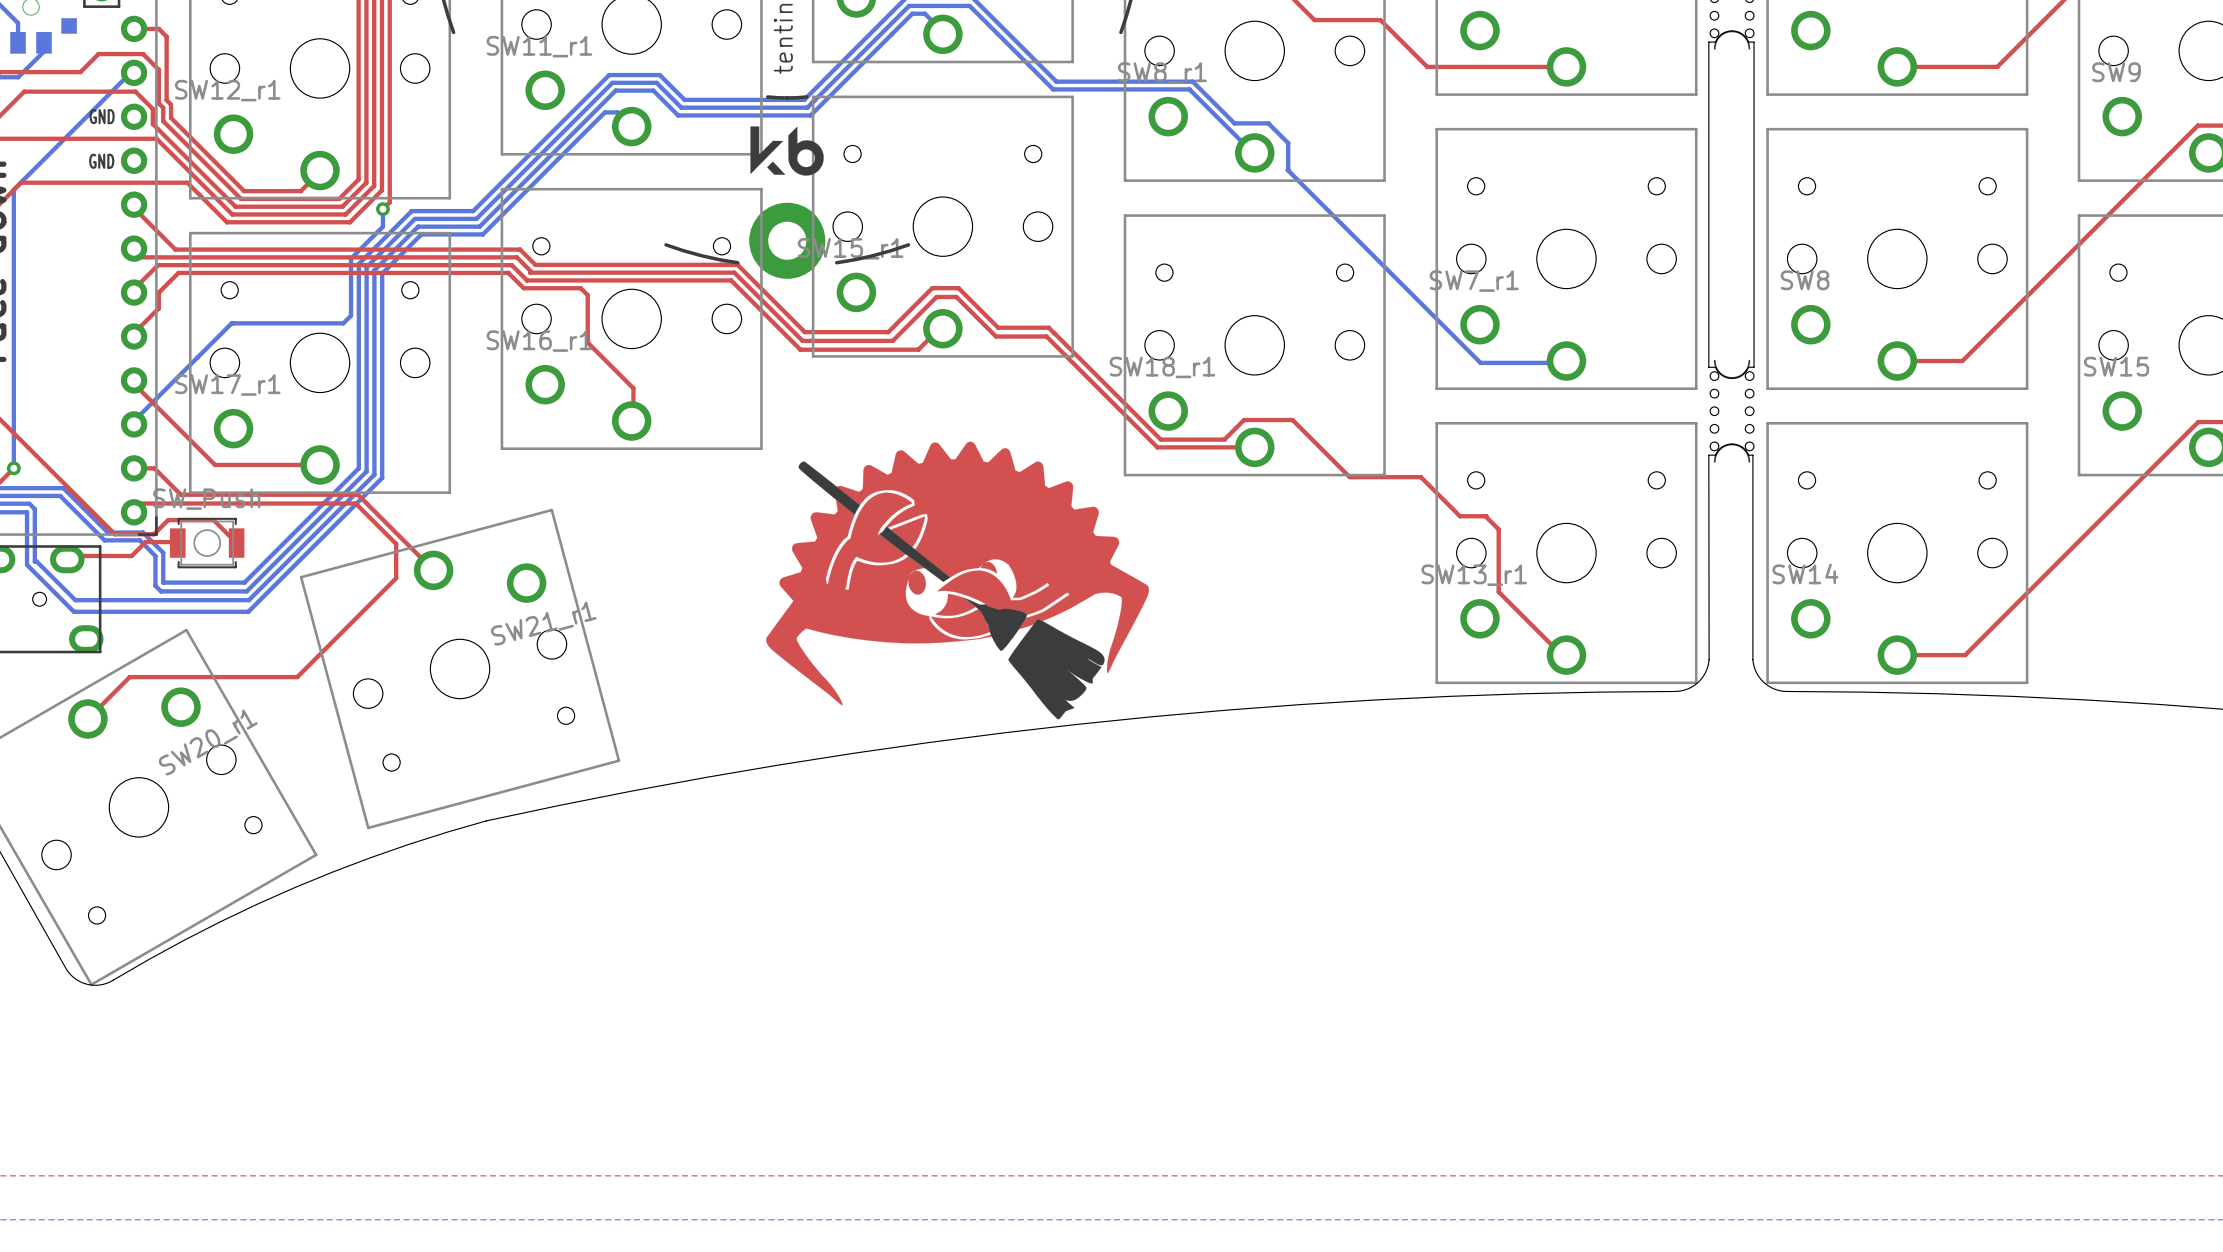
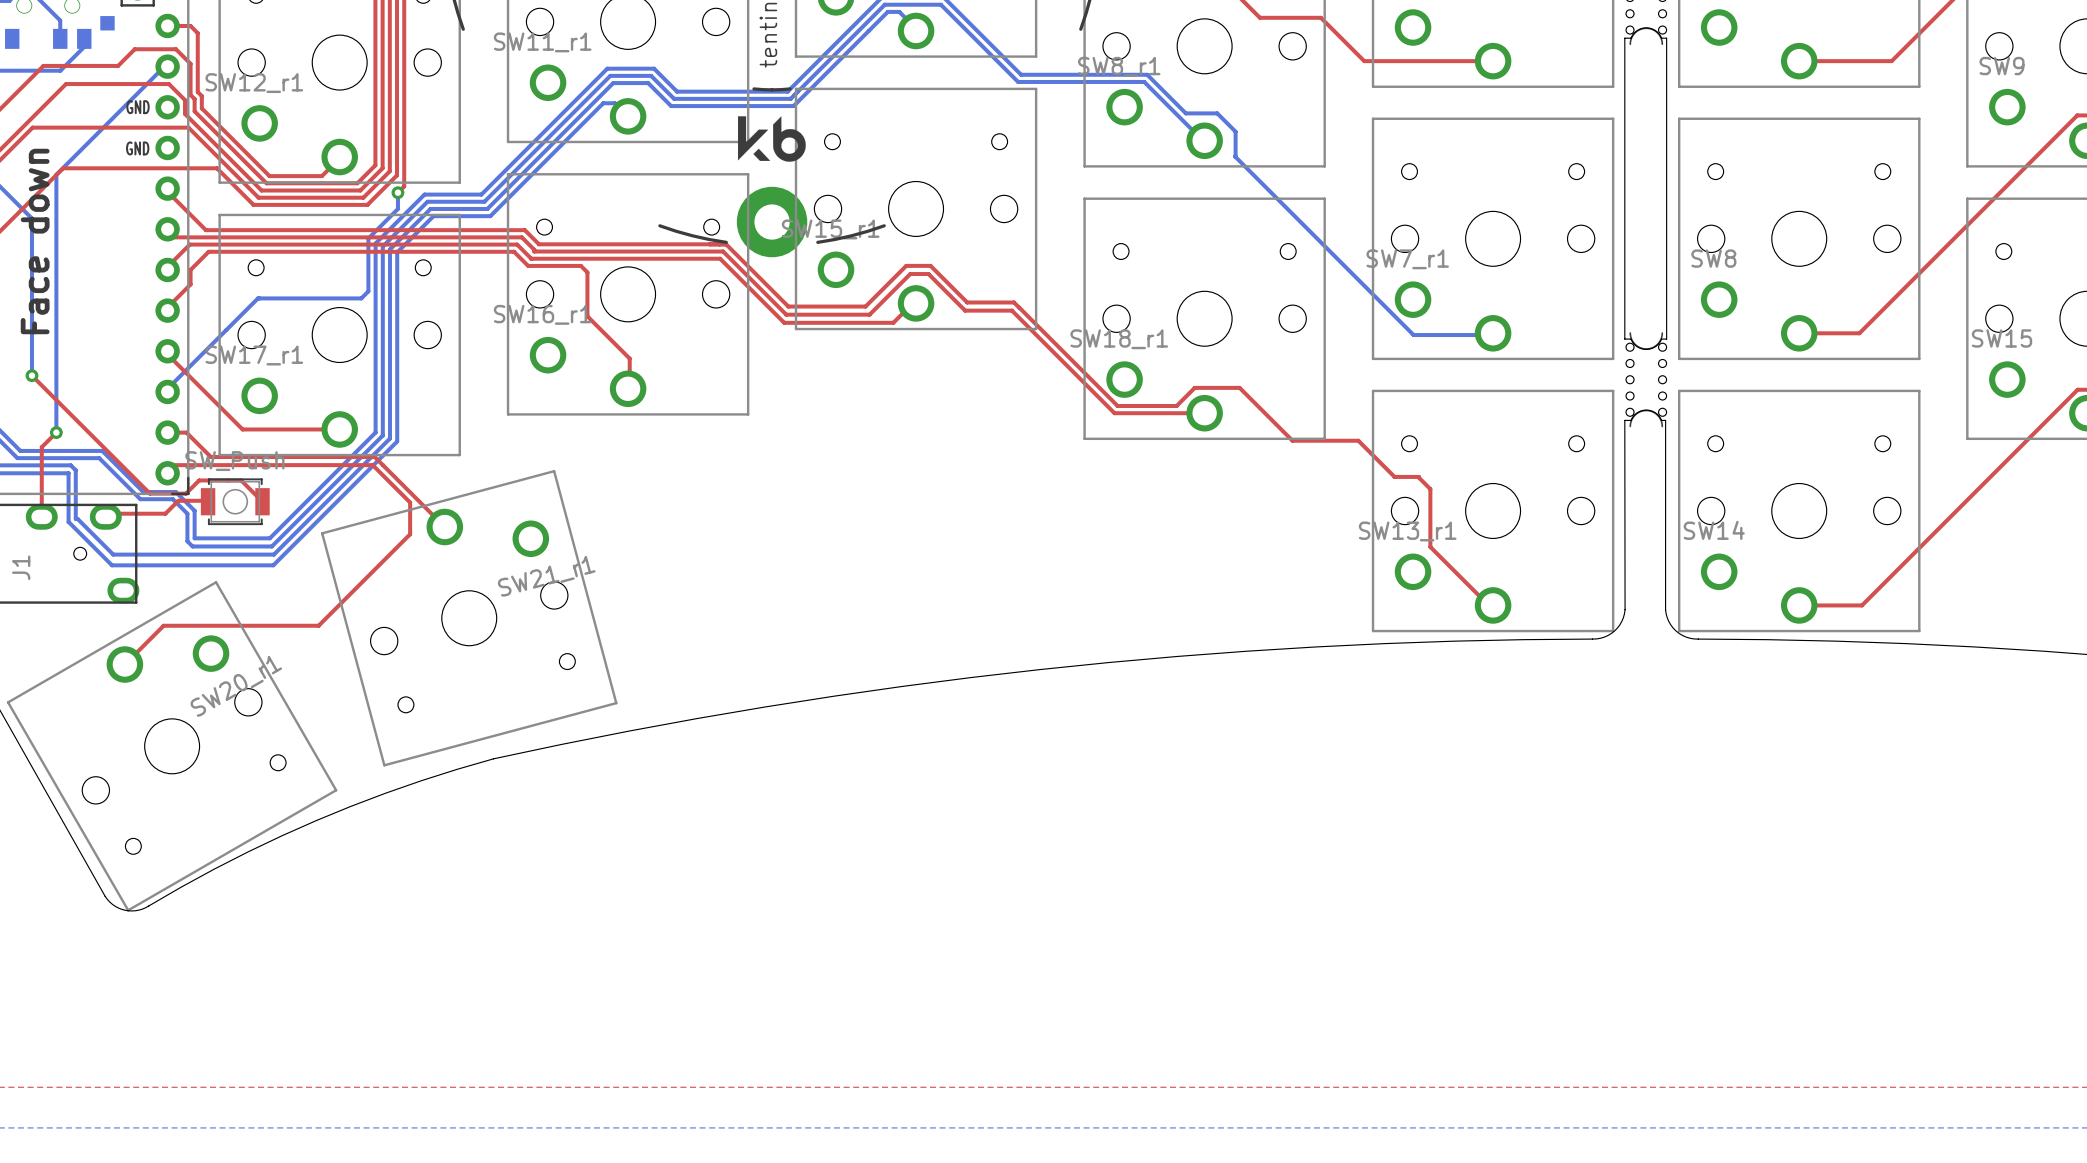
drawing: [766, 441, 1149, 720] -> none

